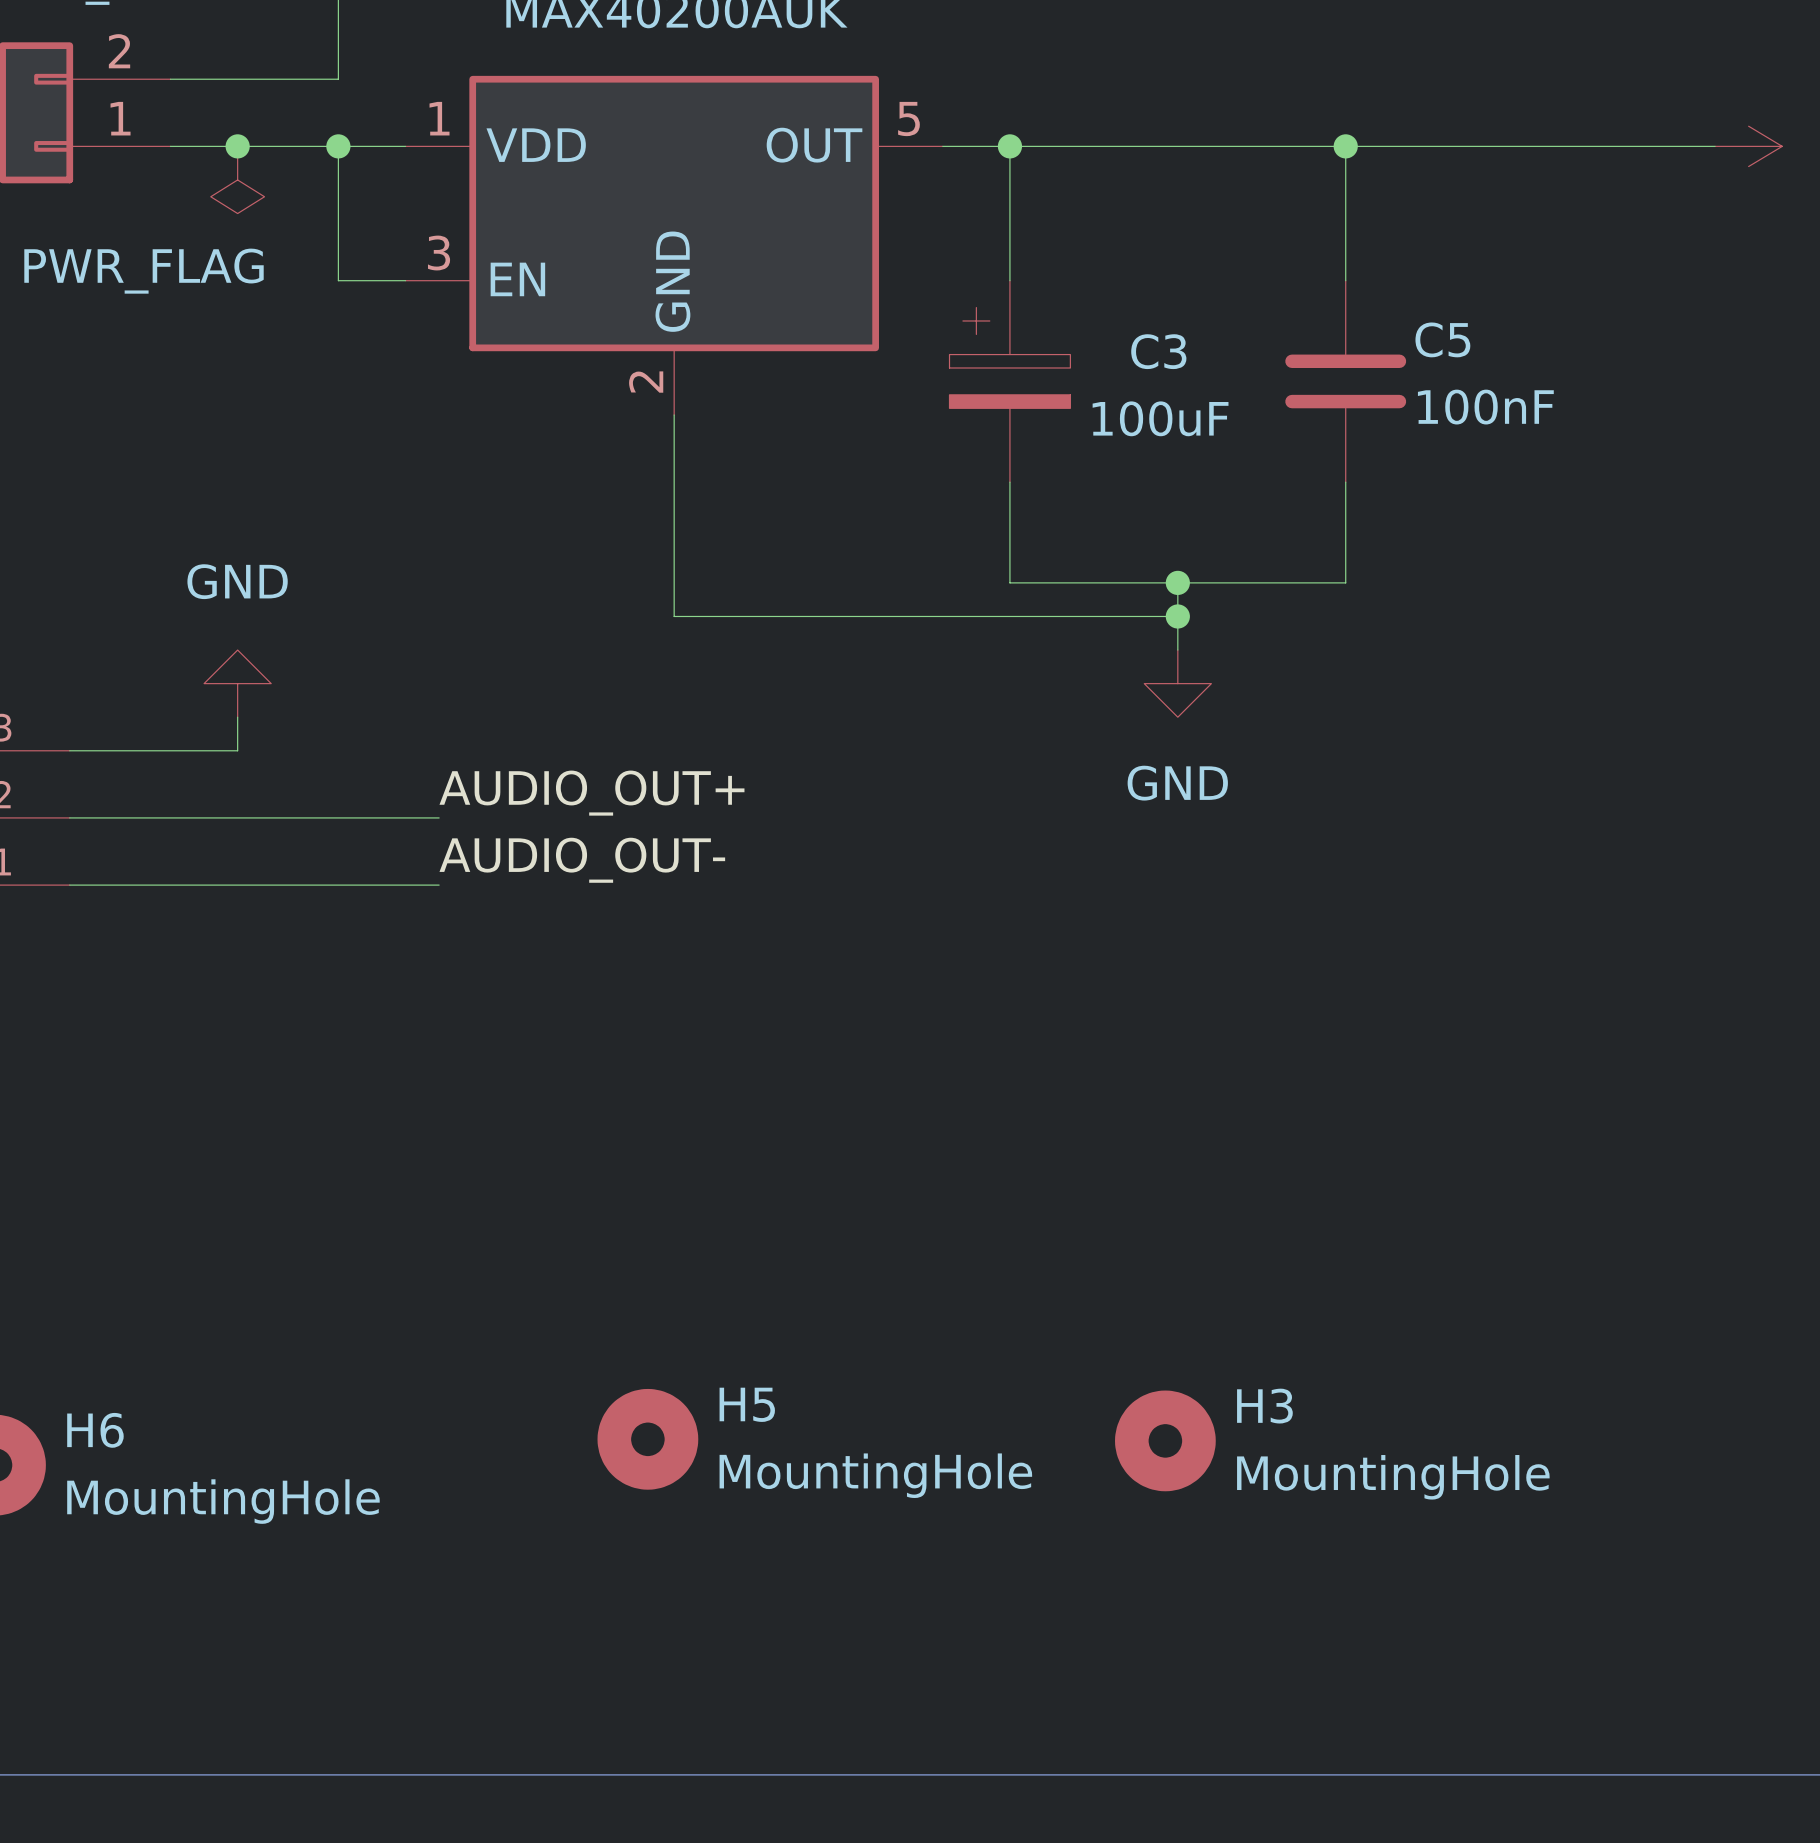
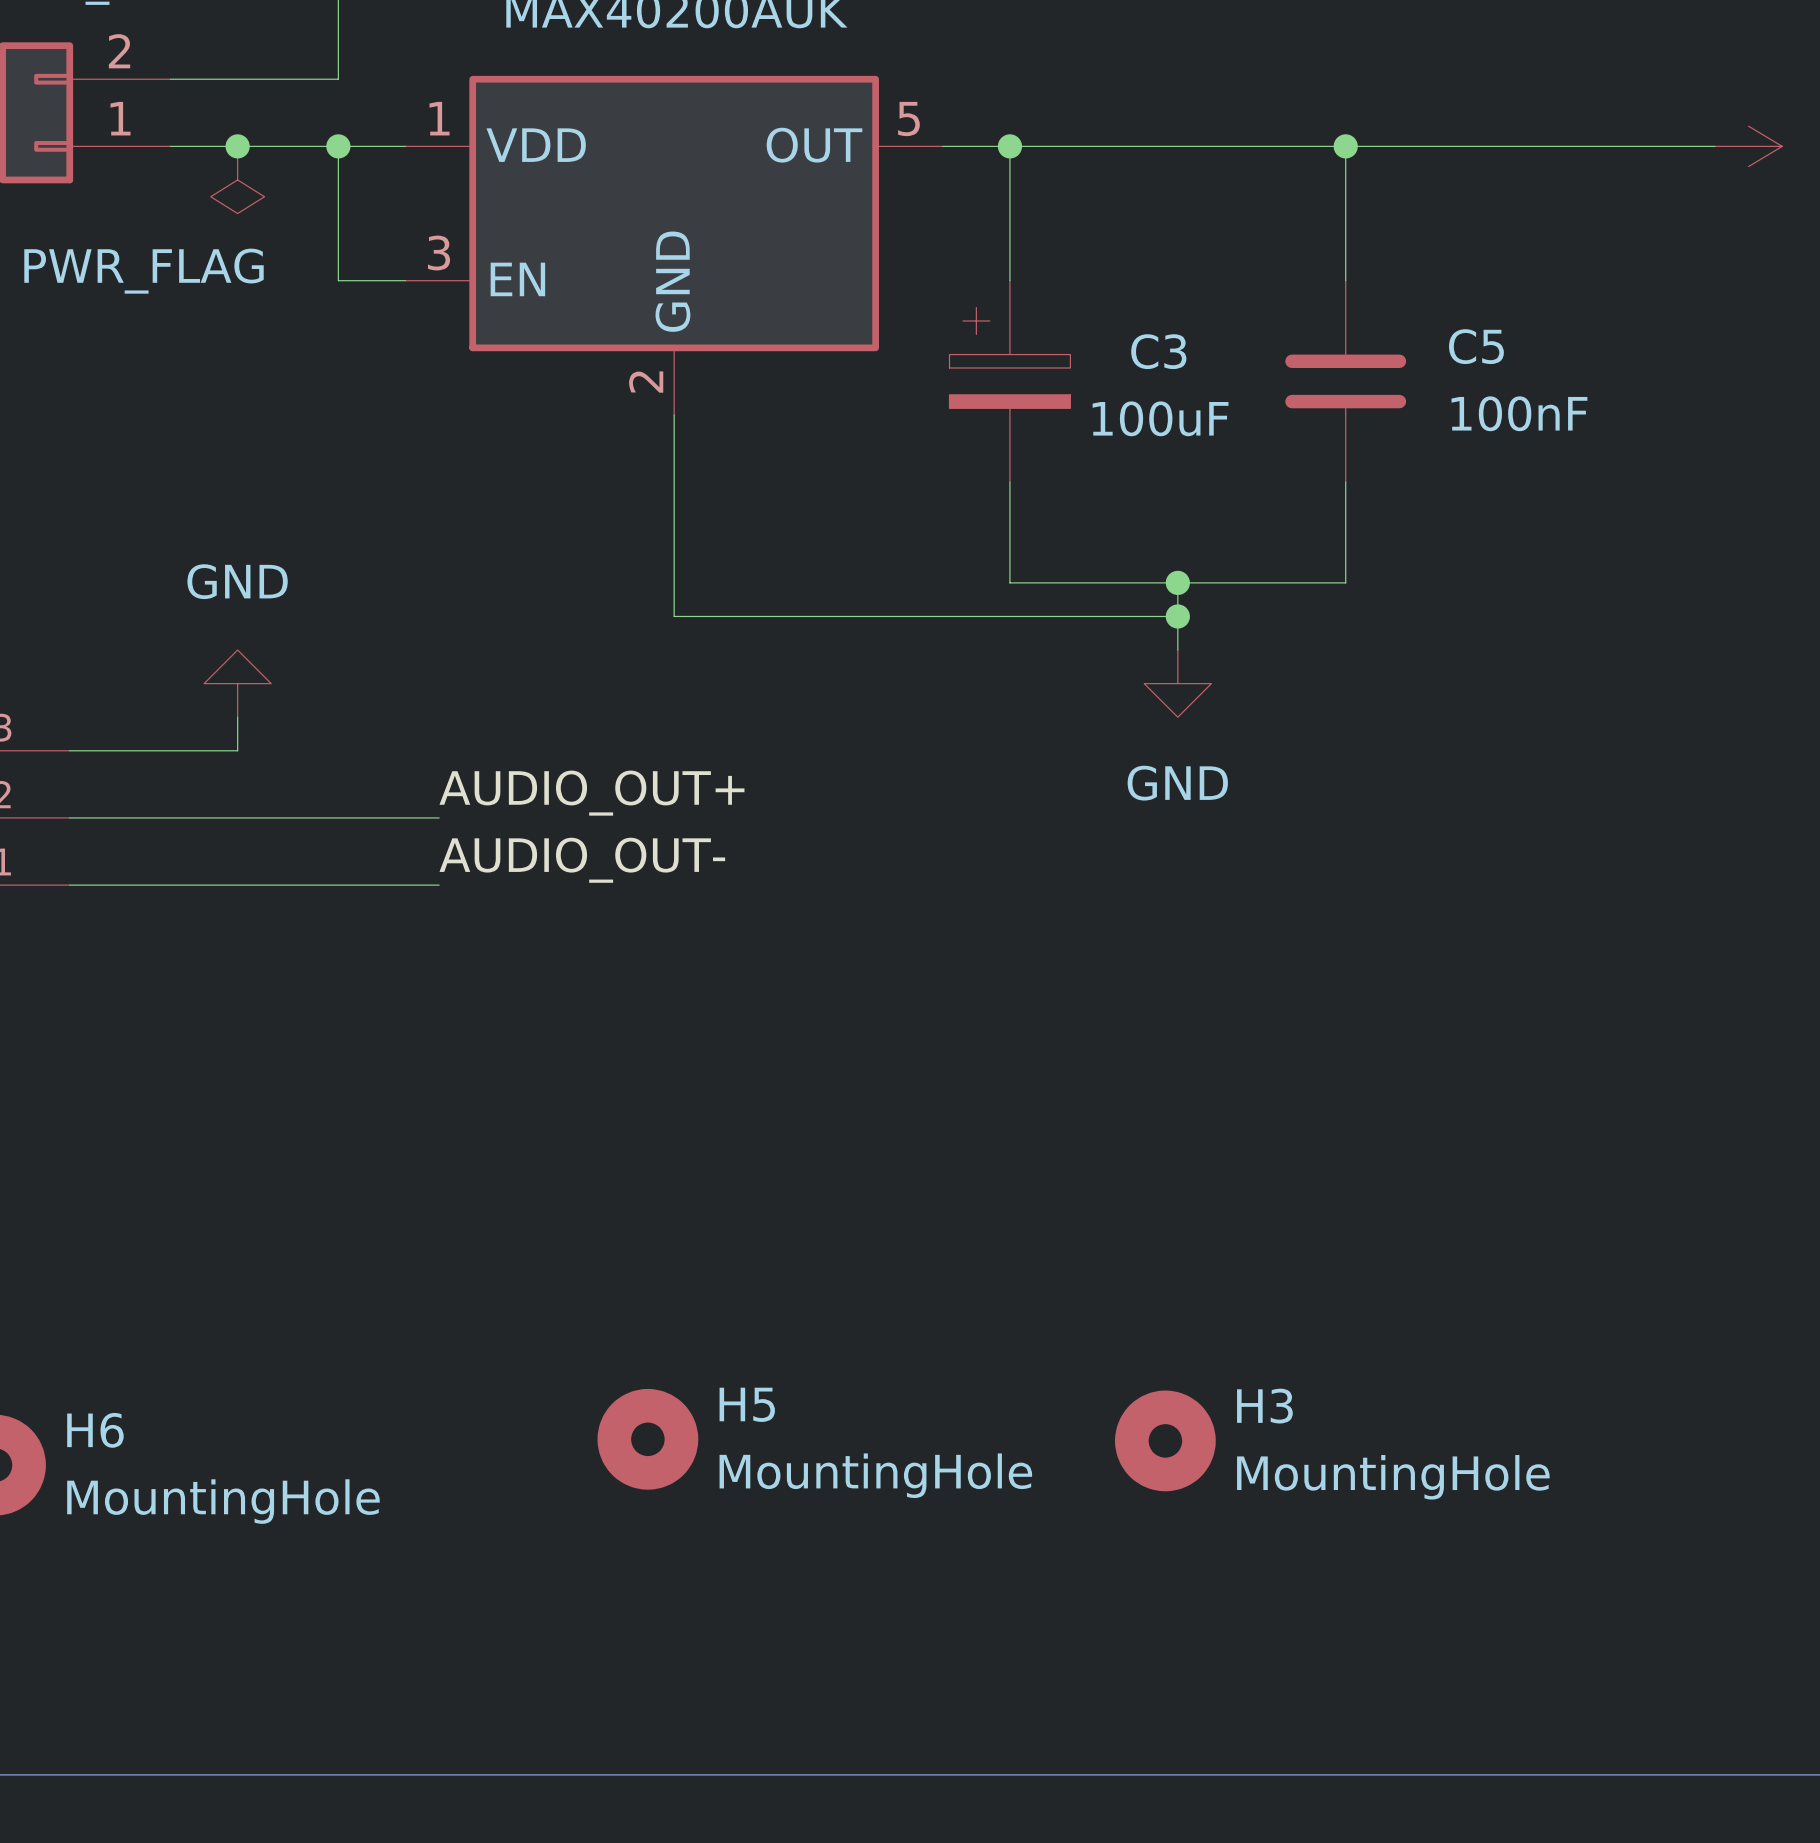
C5 name position: C5 (1442, 339) -> C5 (1476, 346)
C5 value position: 100nF (1485, 407) -> 100nF (1519, 413)

